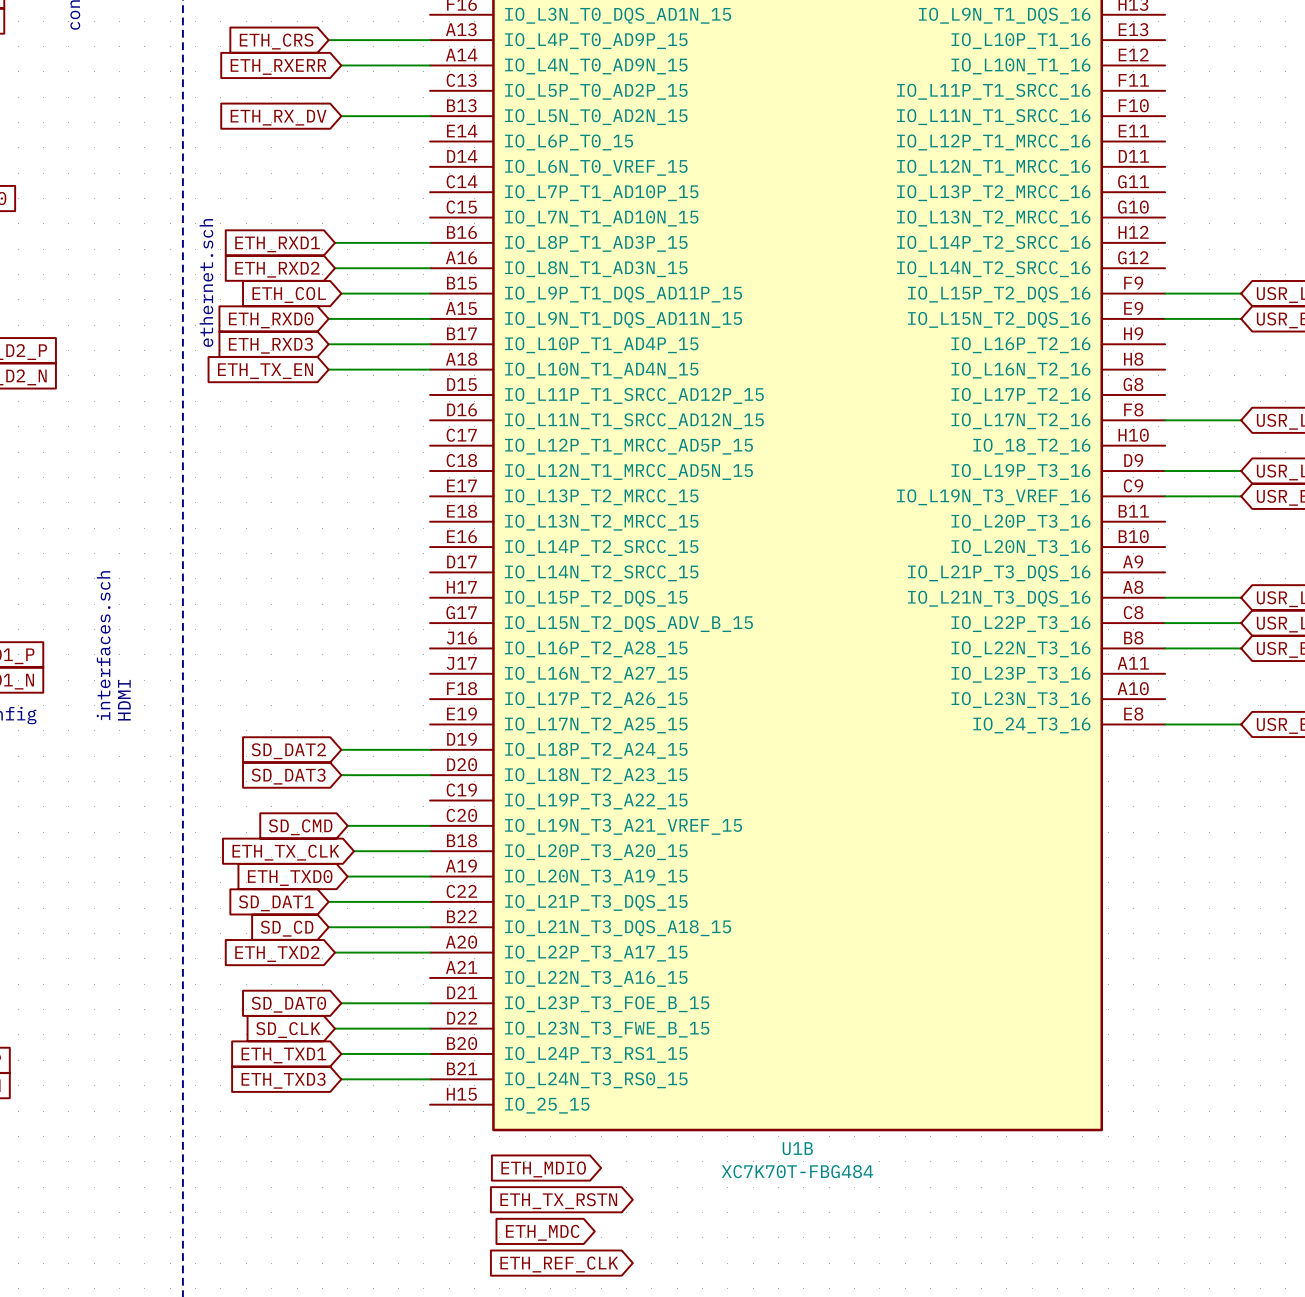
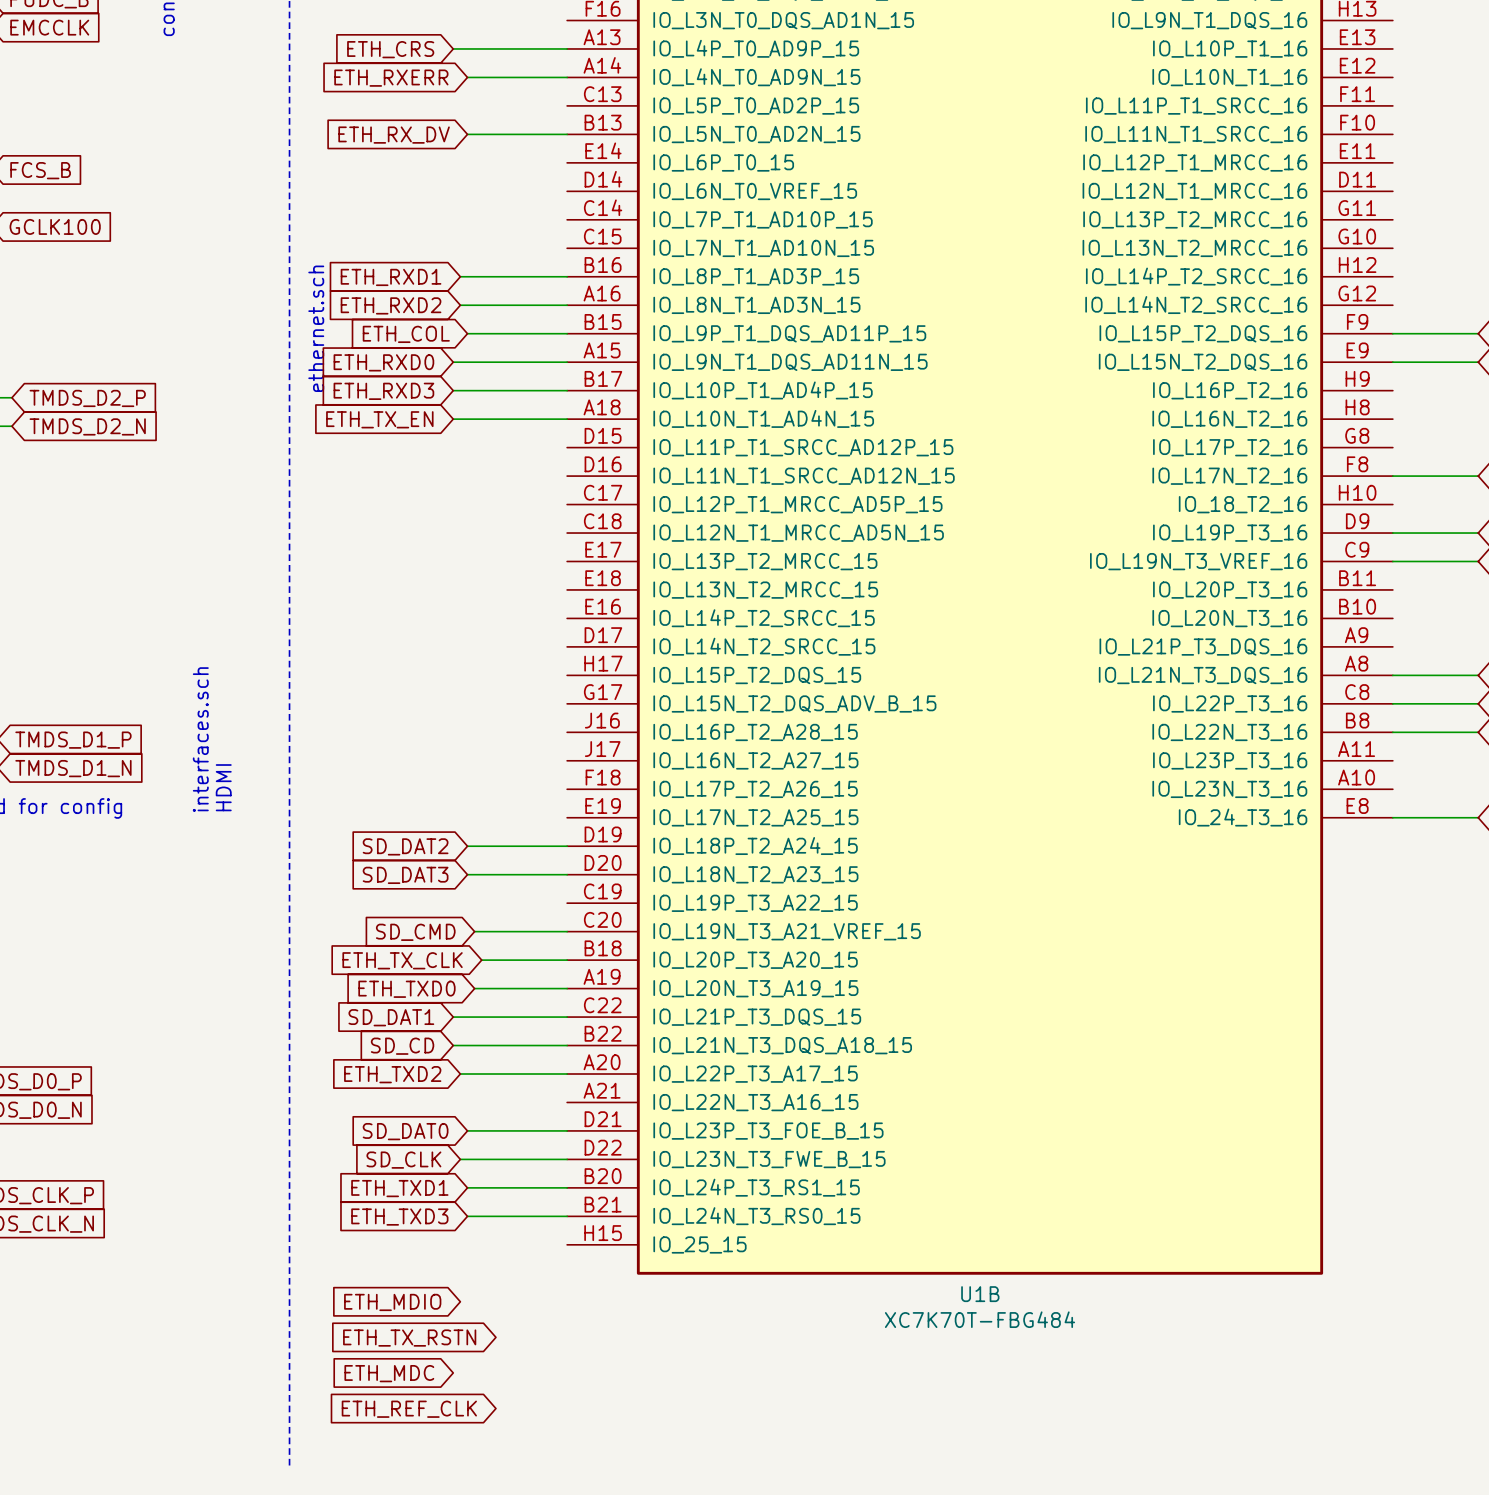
global label: none -> ETH_MDIO (392, 1302)
global label: ETH_MDIO (543, 1169) -> none
global label: none -> ETH_TX_RSTN (409, 1338)
global label: ETH_TX_RSTN (558, 1201) -> none
global label: none -> ETH_MDC (389, 1373)
global label: ETH_MDC (542, 1232) -> none
global label: none -> ETH_REF_CLK (409, 1409)
global label: ETH_REF_CLK (559, 1264) -> none

